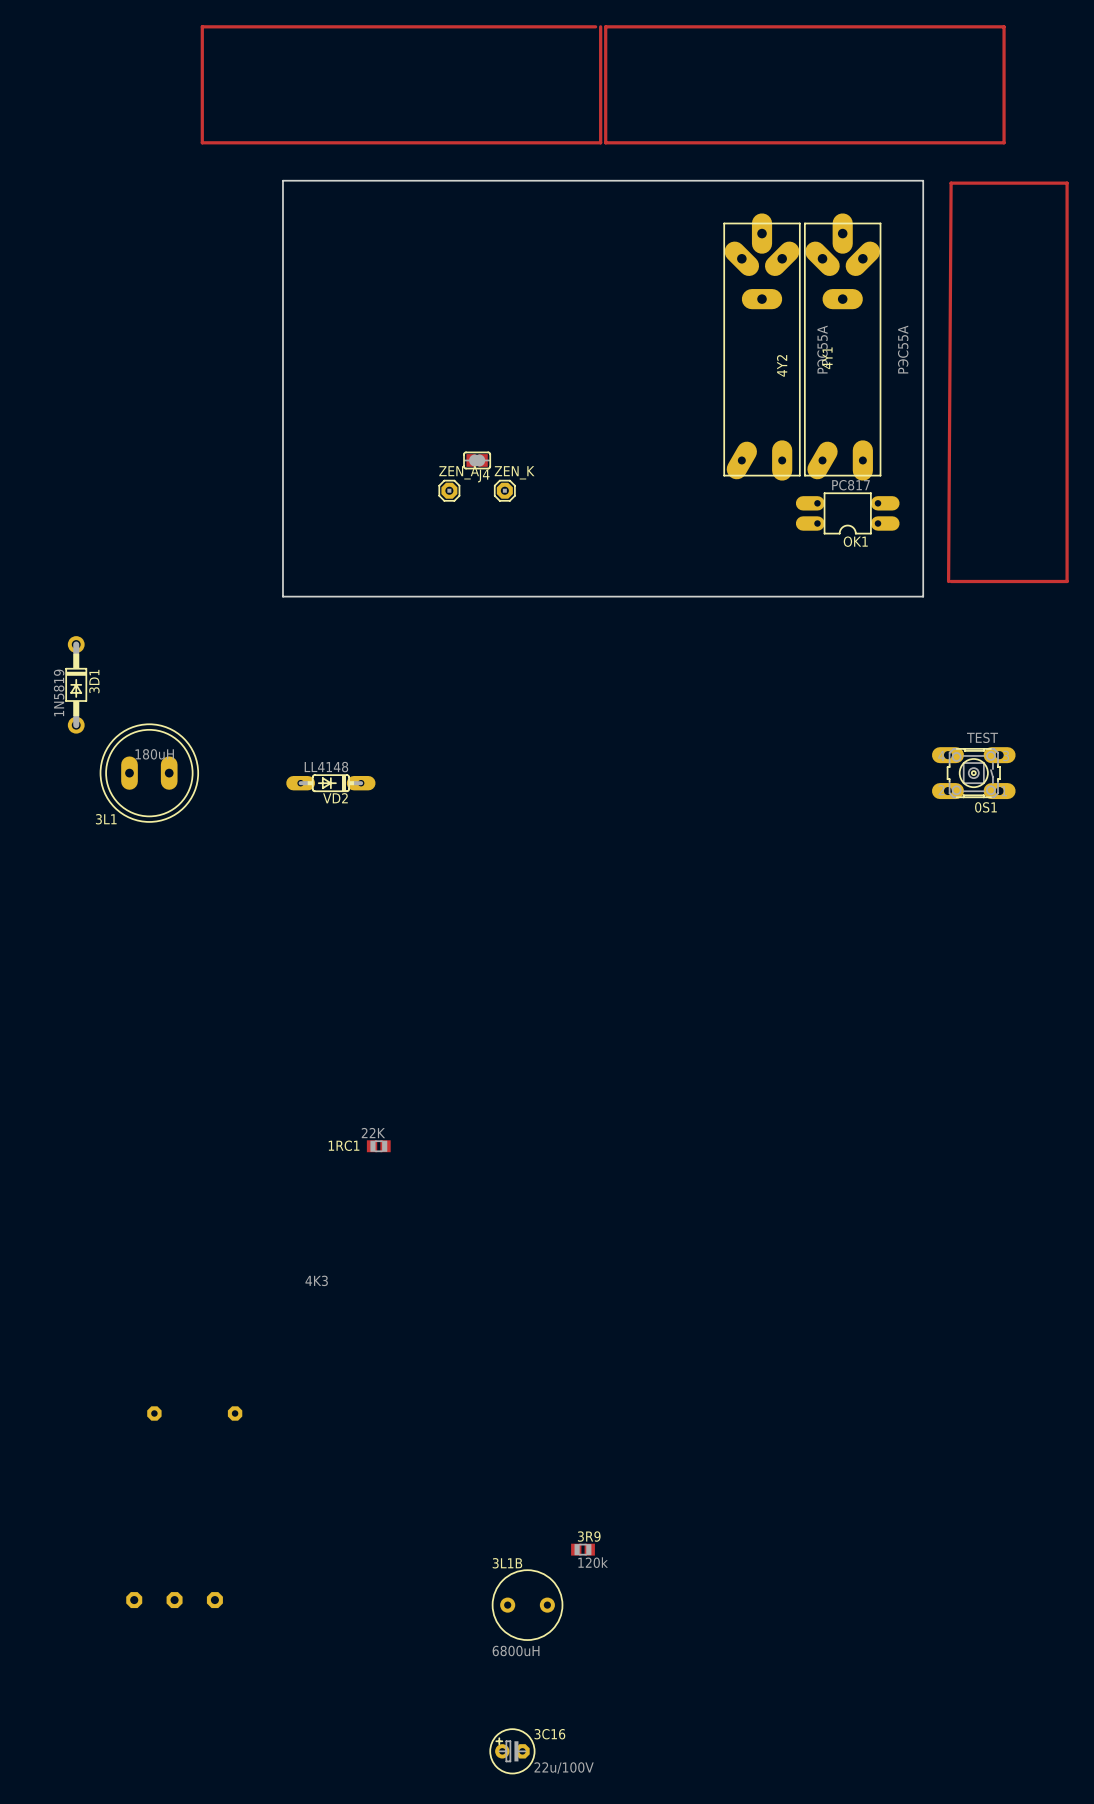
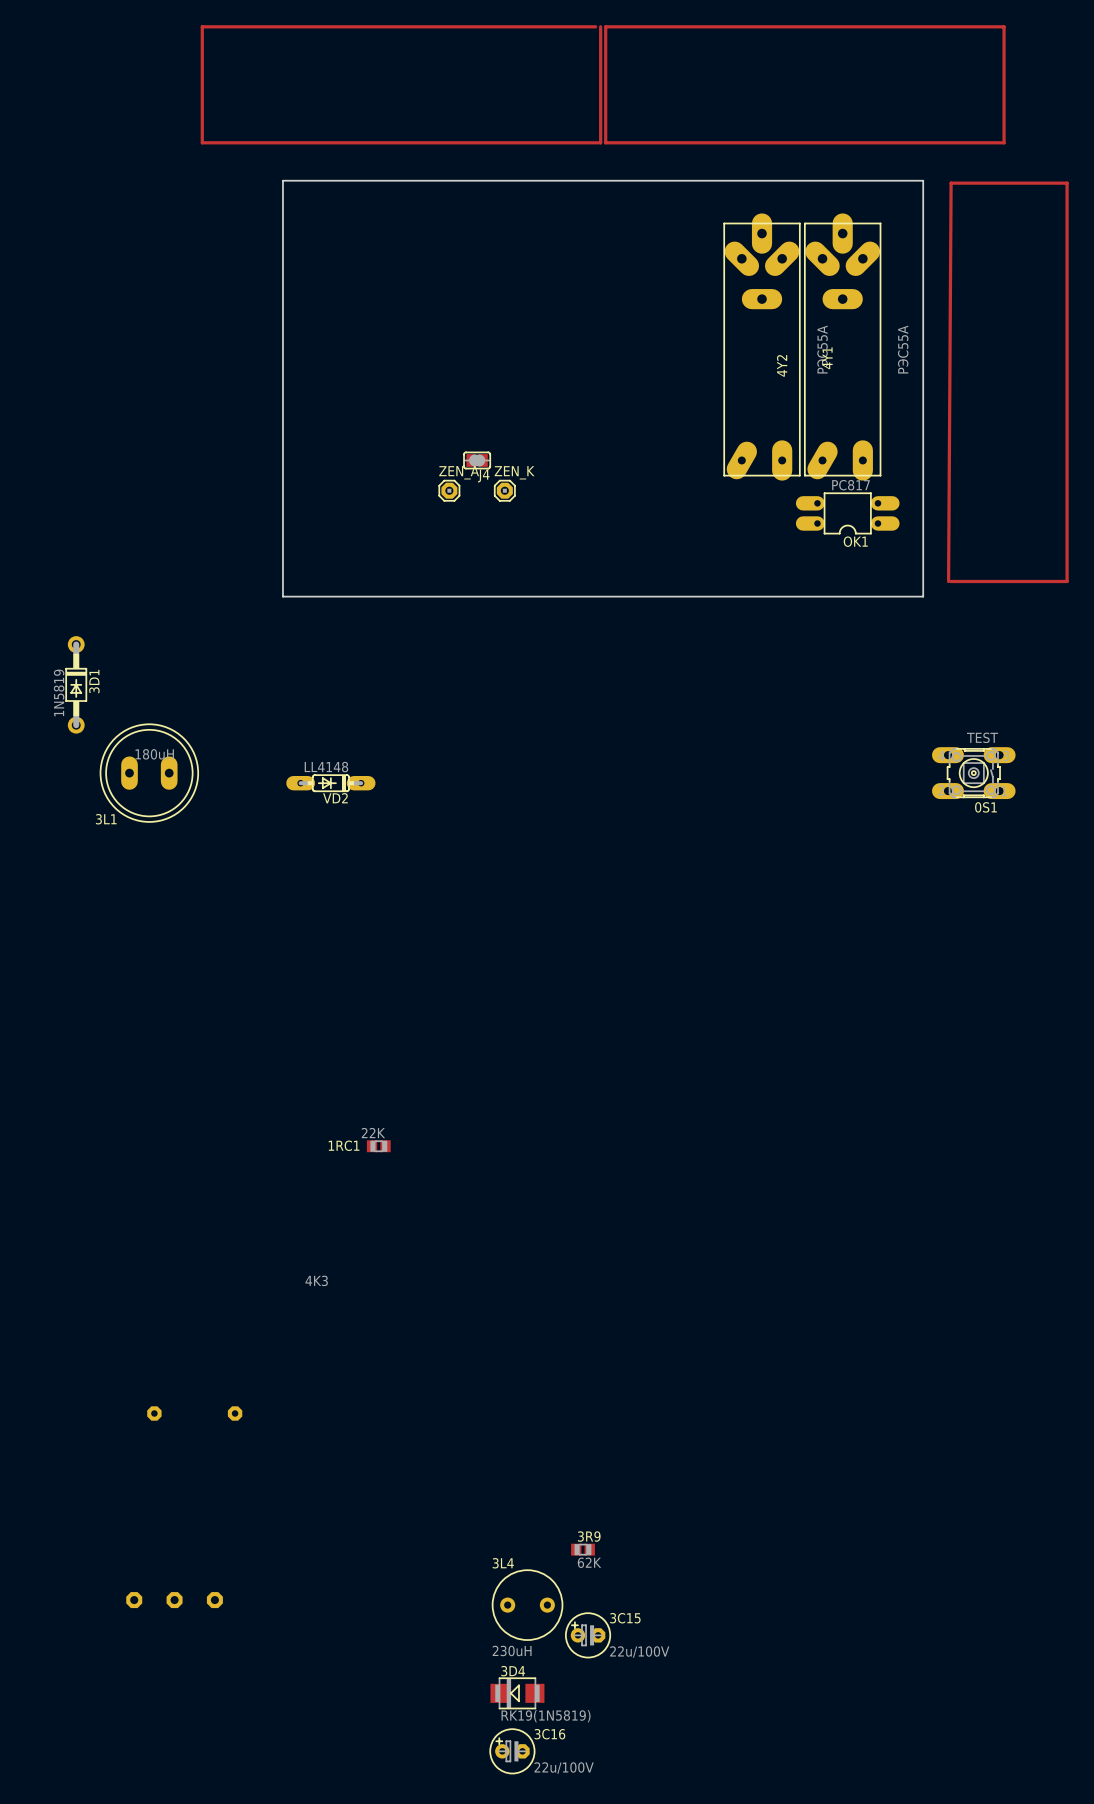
3R9 value: 120k (593, 1562) -> 62K (589, 1562)
3L1B name: 3L1B (507, 1563) -> 3L4 (503, 1563)
3C15: none -> 22u/100V (588, 1635)
3L1B value: 6800uH (516, 1650) -> 230uH (512, 1650)
3D4: none -> RK19(1N5819) (517, 1693)

